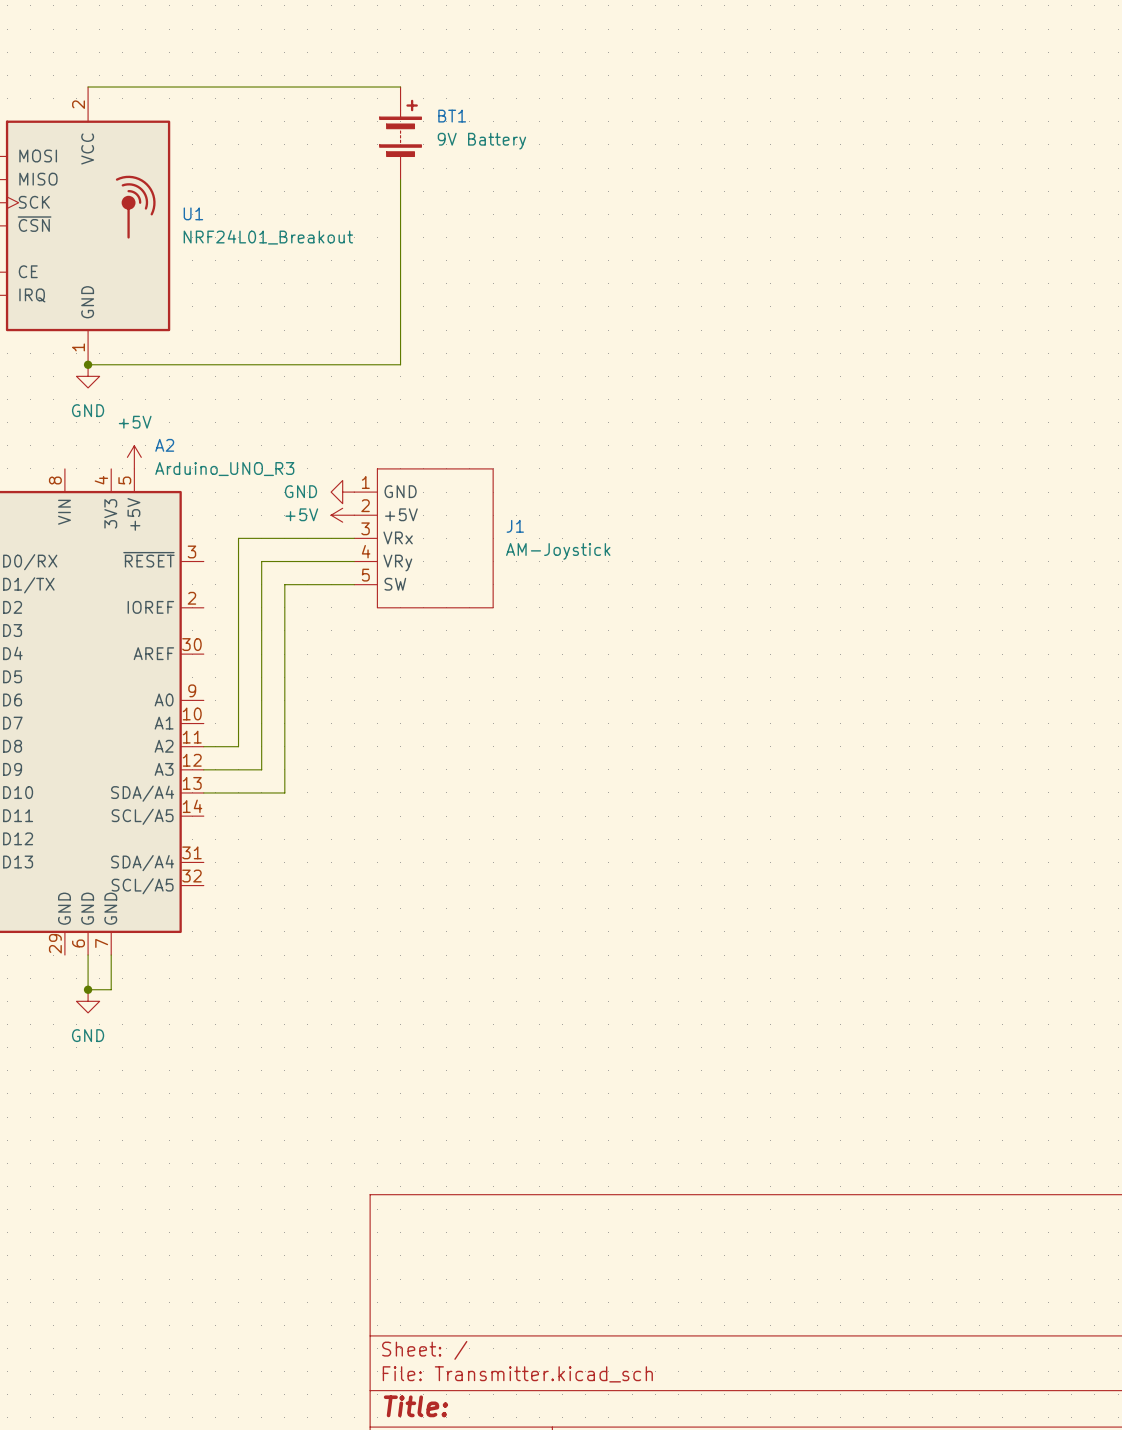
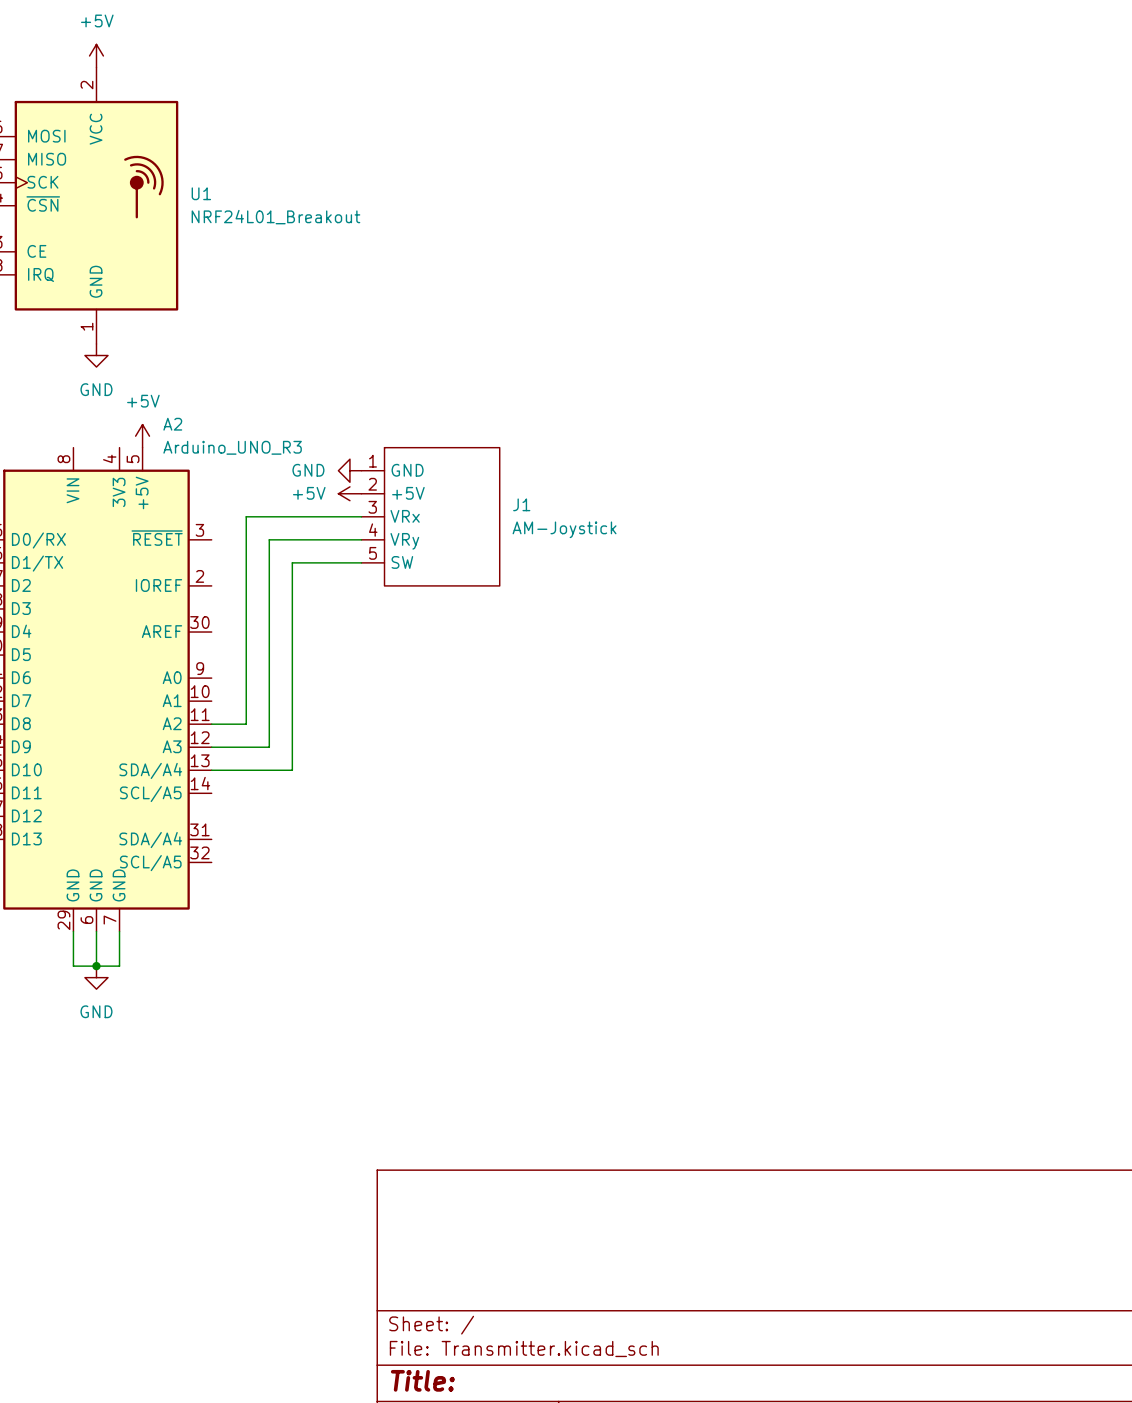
power symbol: none -> +5V (96, 55)
wire: (88, 87) (400, 87) -> none
BT1: 9V Battery (400, 133) -> none
wire: (400, 179) (400, 364) (88, 364) -> none
junction: (88, 364) -> none
wire: none -> (73, 931) (73, 966) (96, 966)

